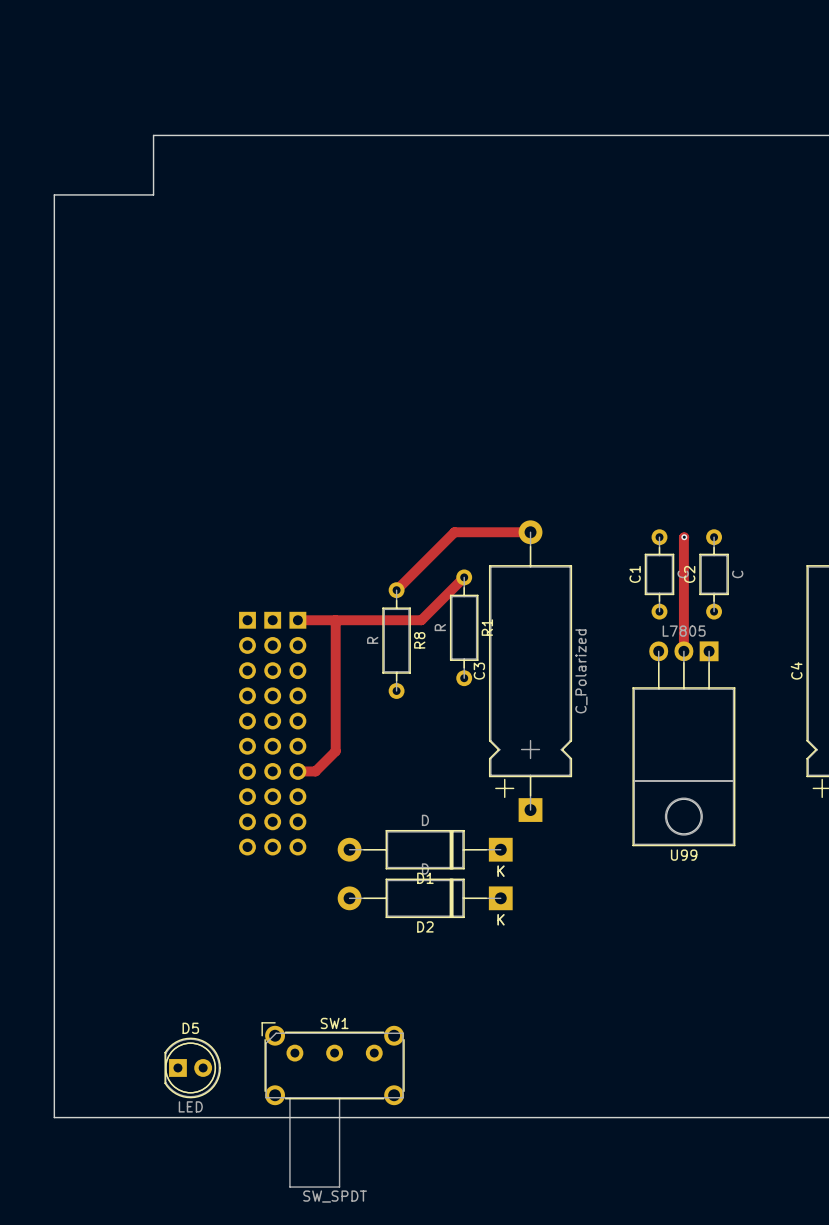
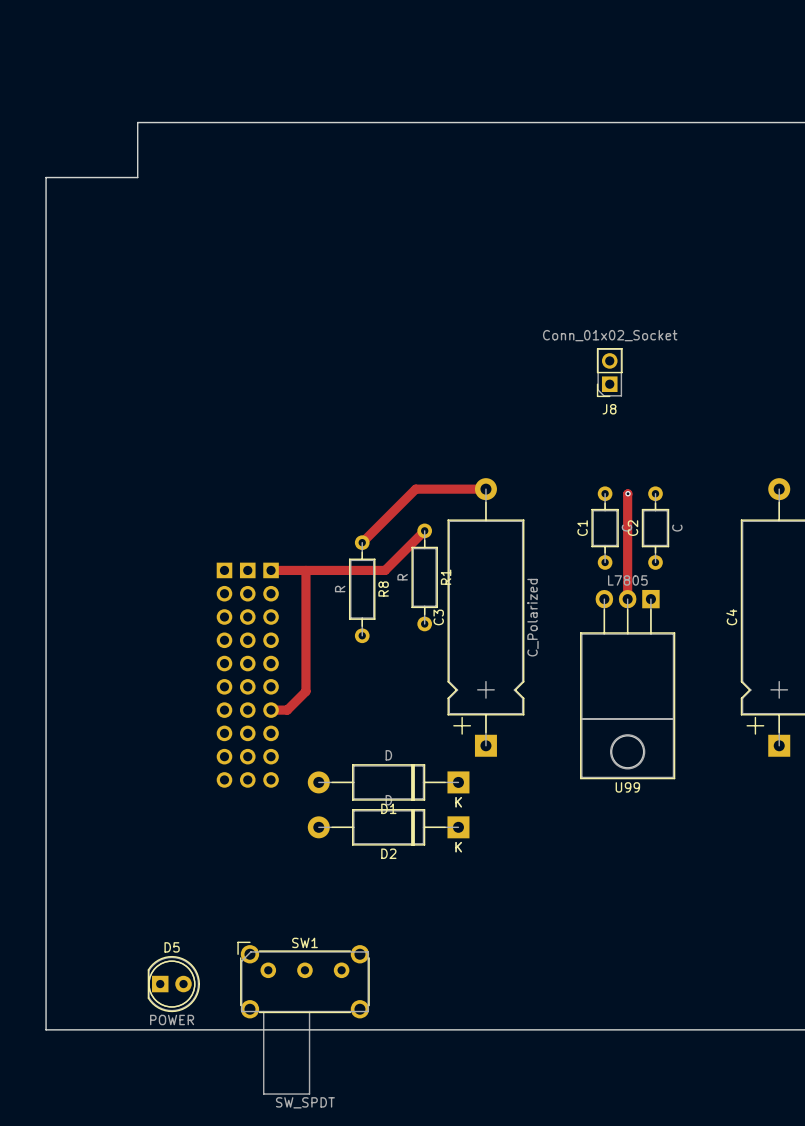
J8: none -> Conn_01x02_Socket (609, 372)
D5 value: LED (190, 1106) -> POWER (172, 1019)

